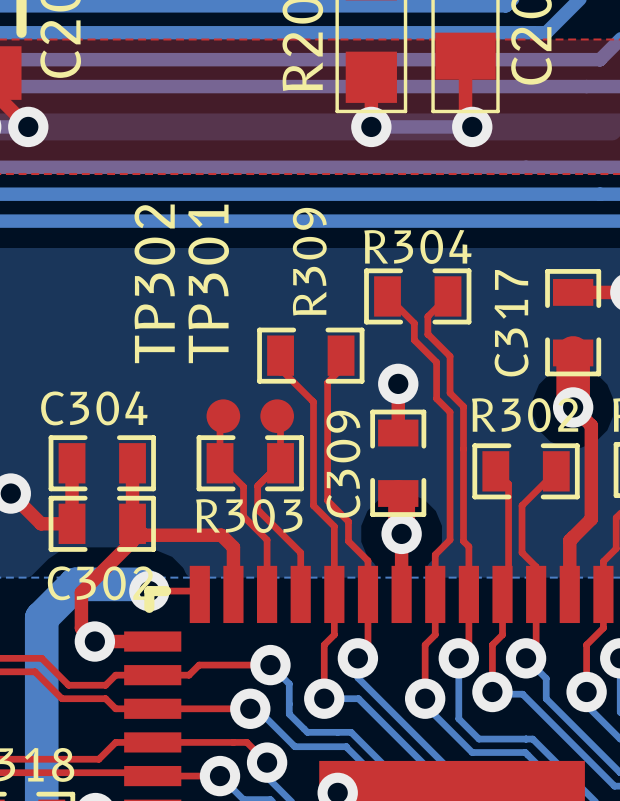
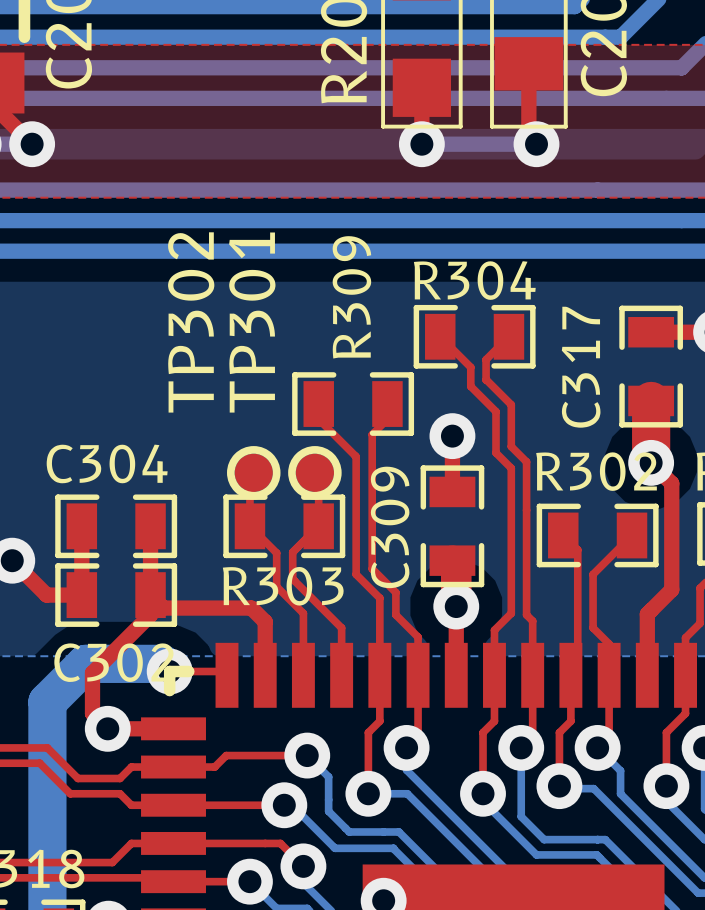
TP302 footprint: [206, 399, 241, 434] -> [227, 446, 281, 500]
TP301 footprint: [260, 399, 294, 434] -> [288, 446, 342, 500]

